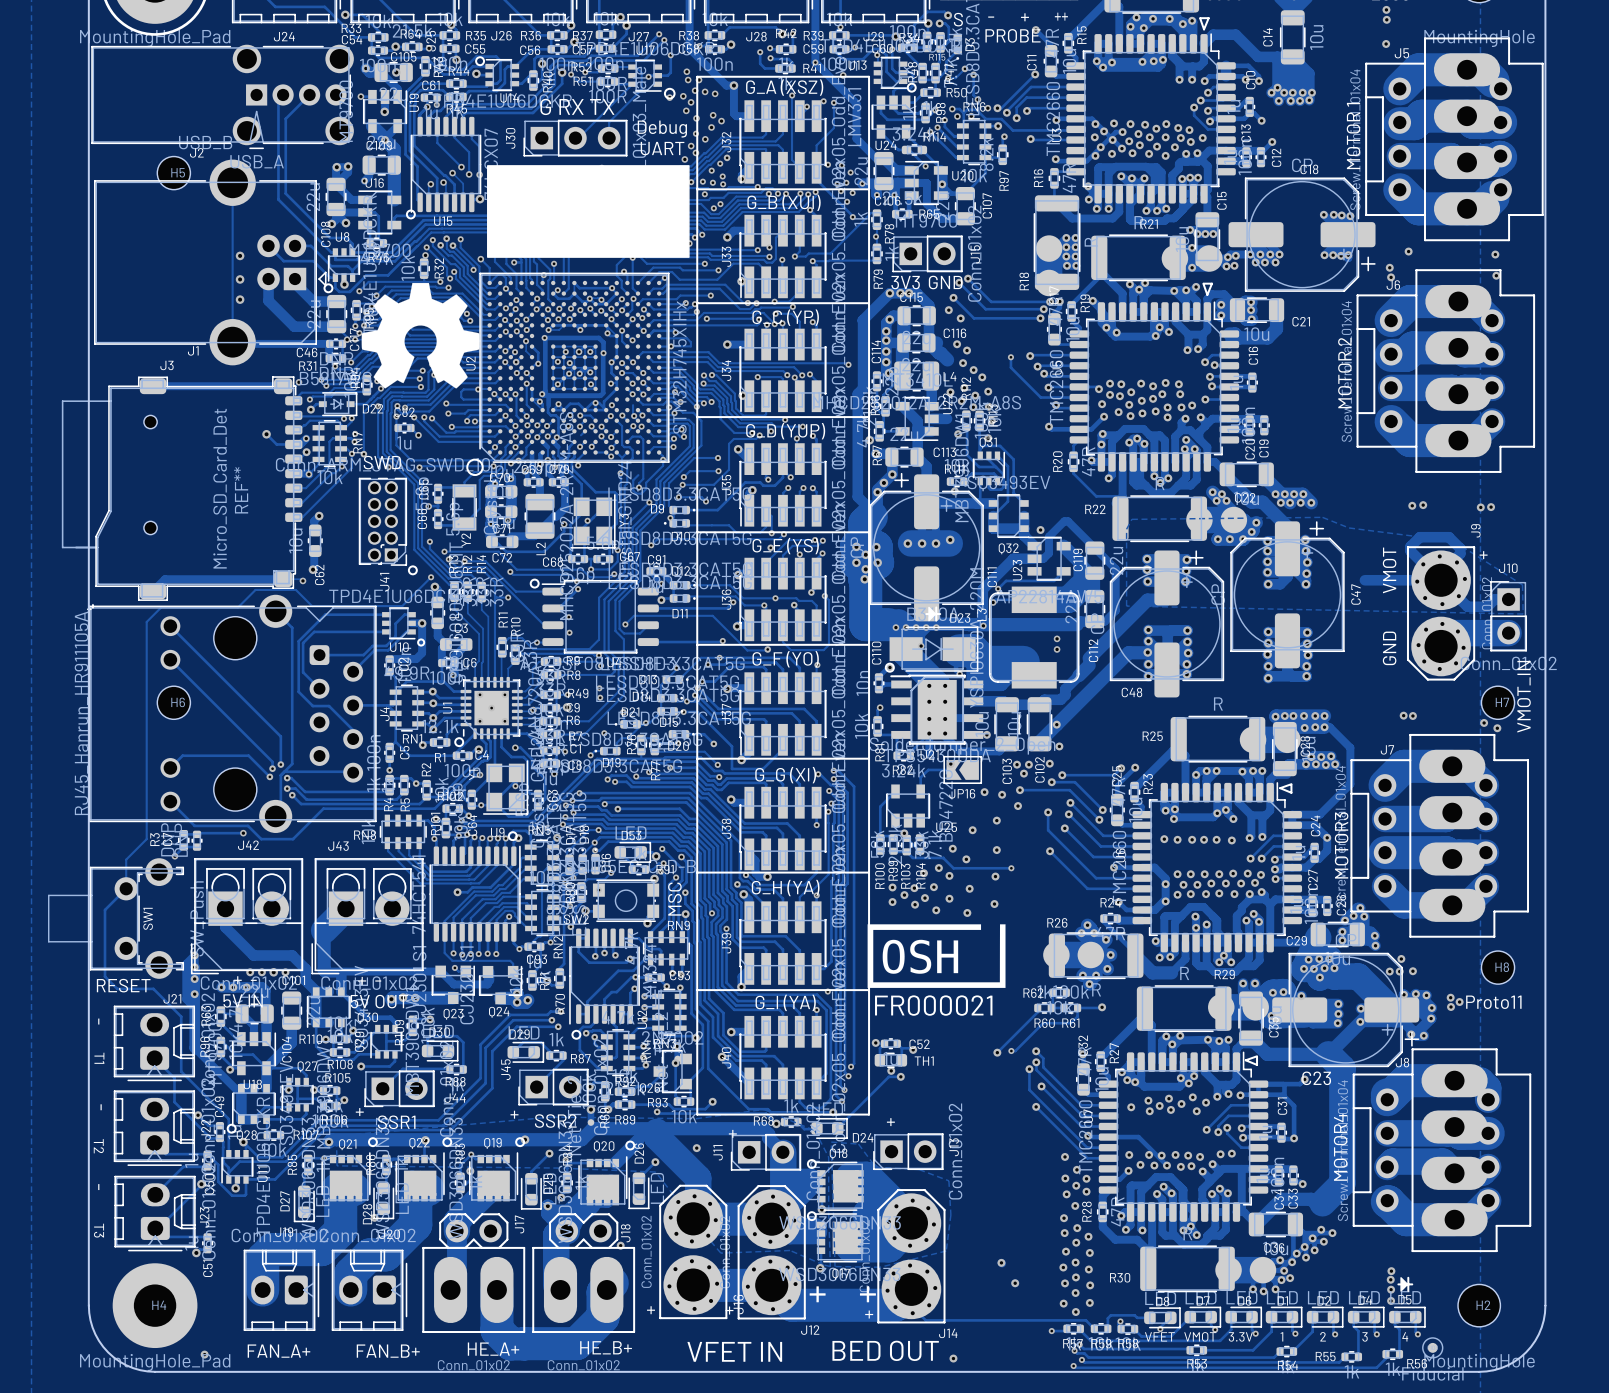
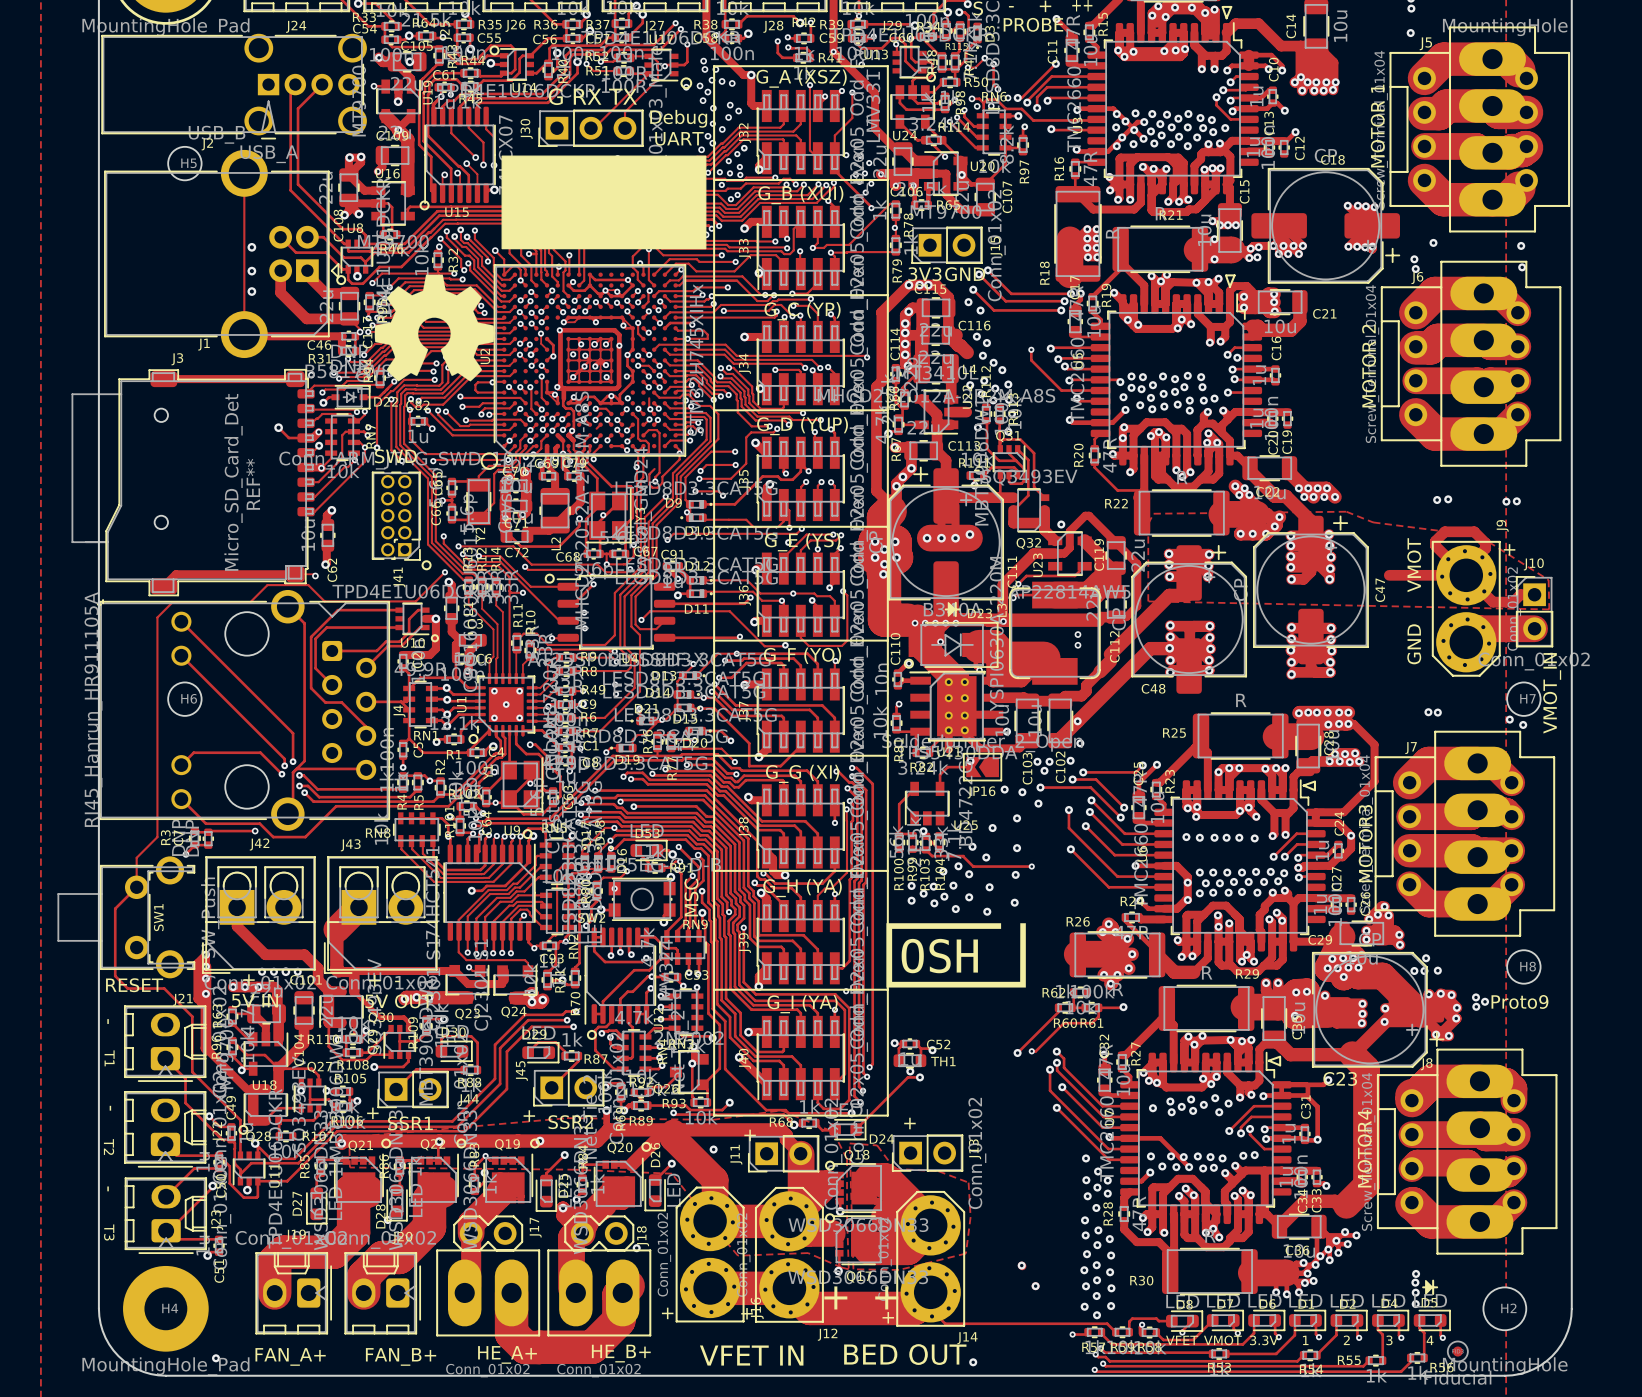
text: Proto11 (1493, 1002) -> Proto9 (1519, 1001)
text: FR000021 (933, 1005) -> none

